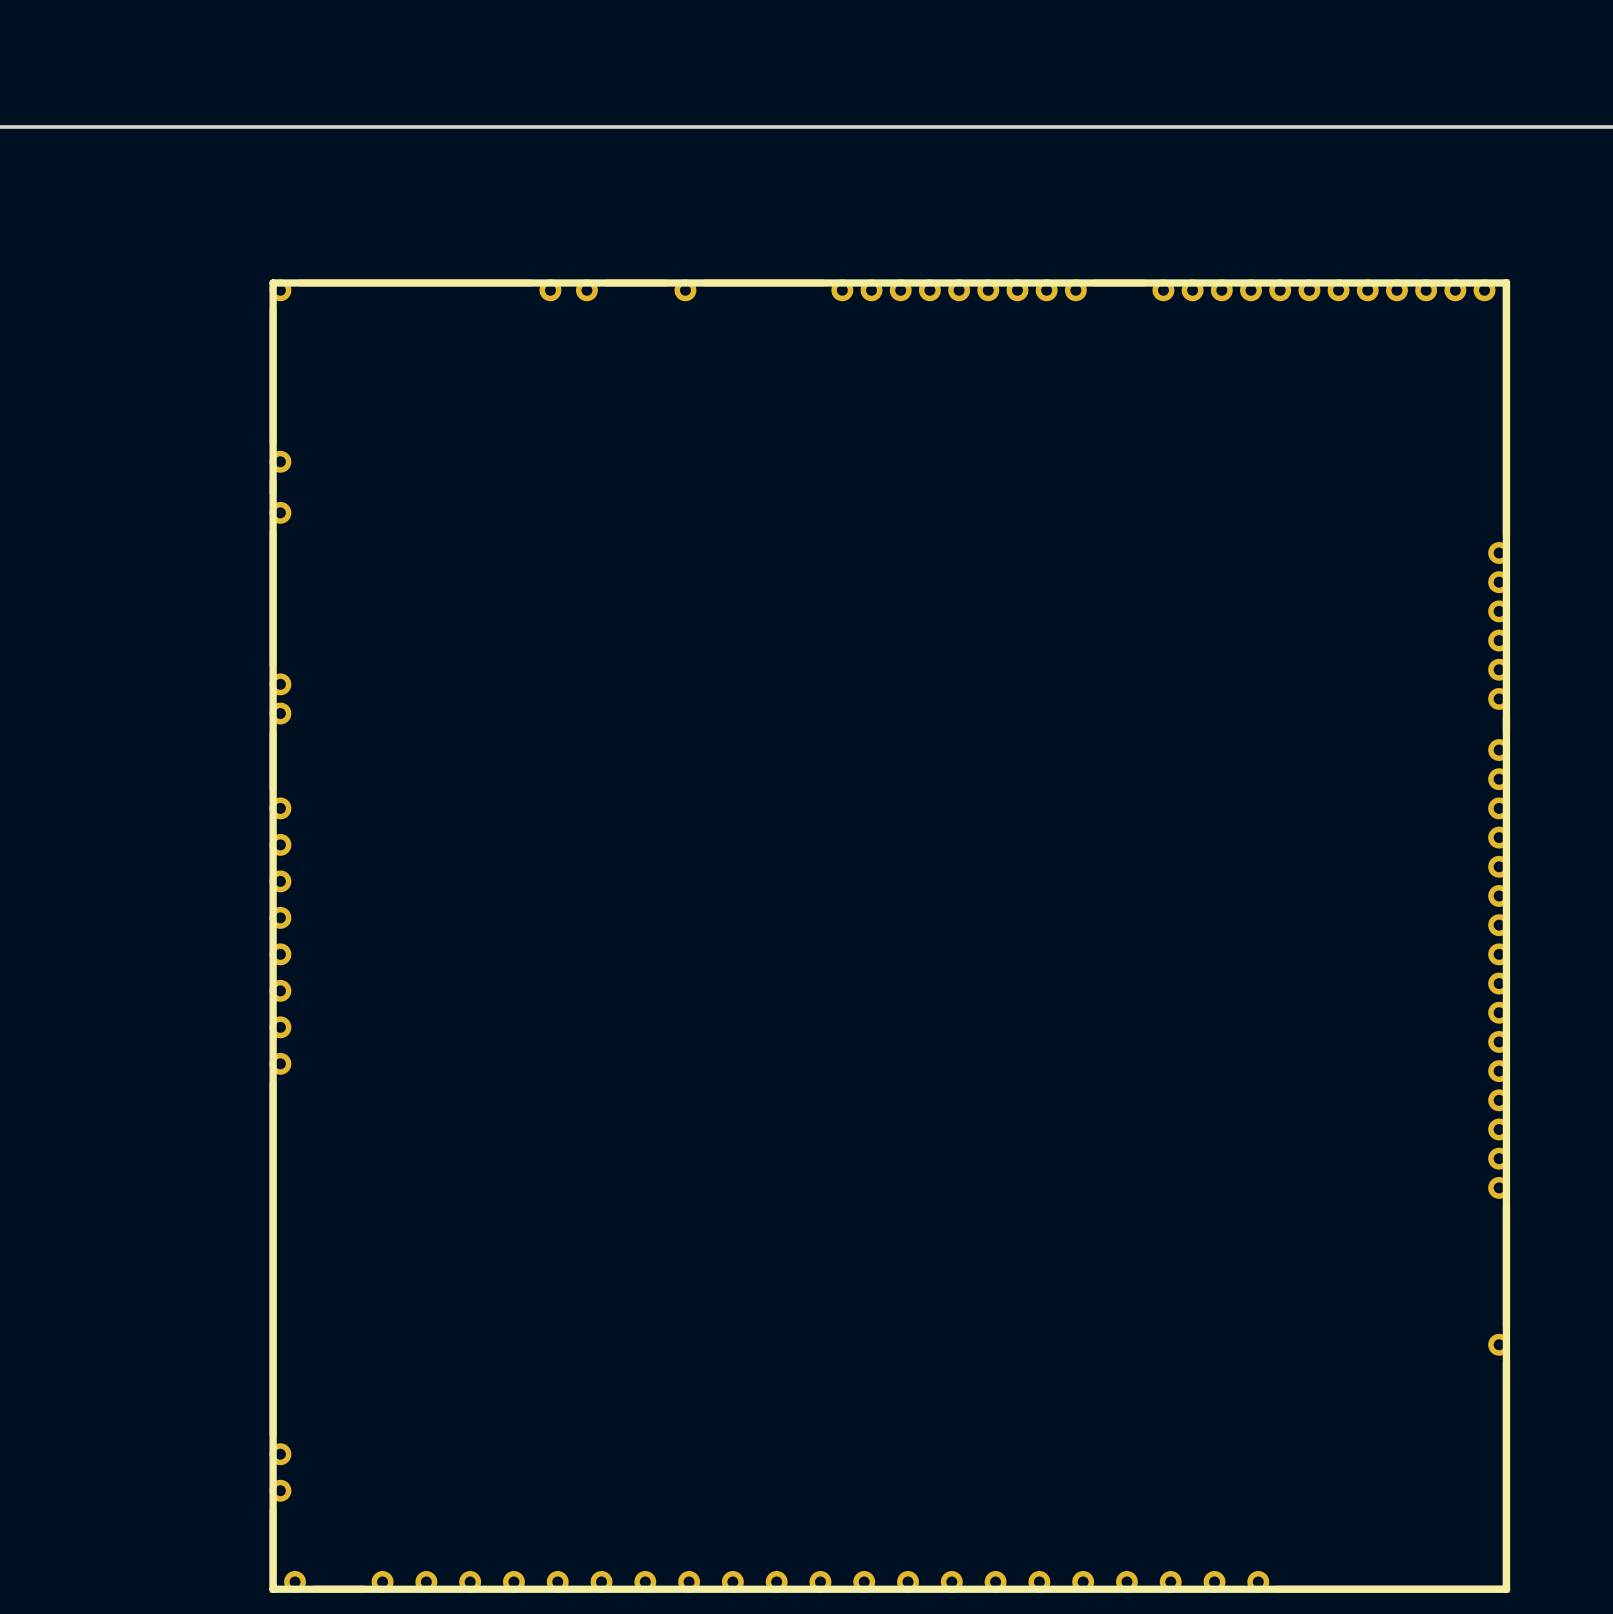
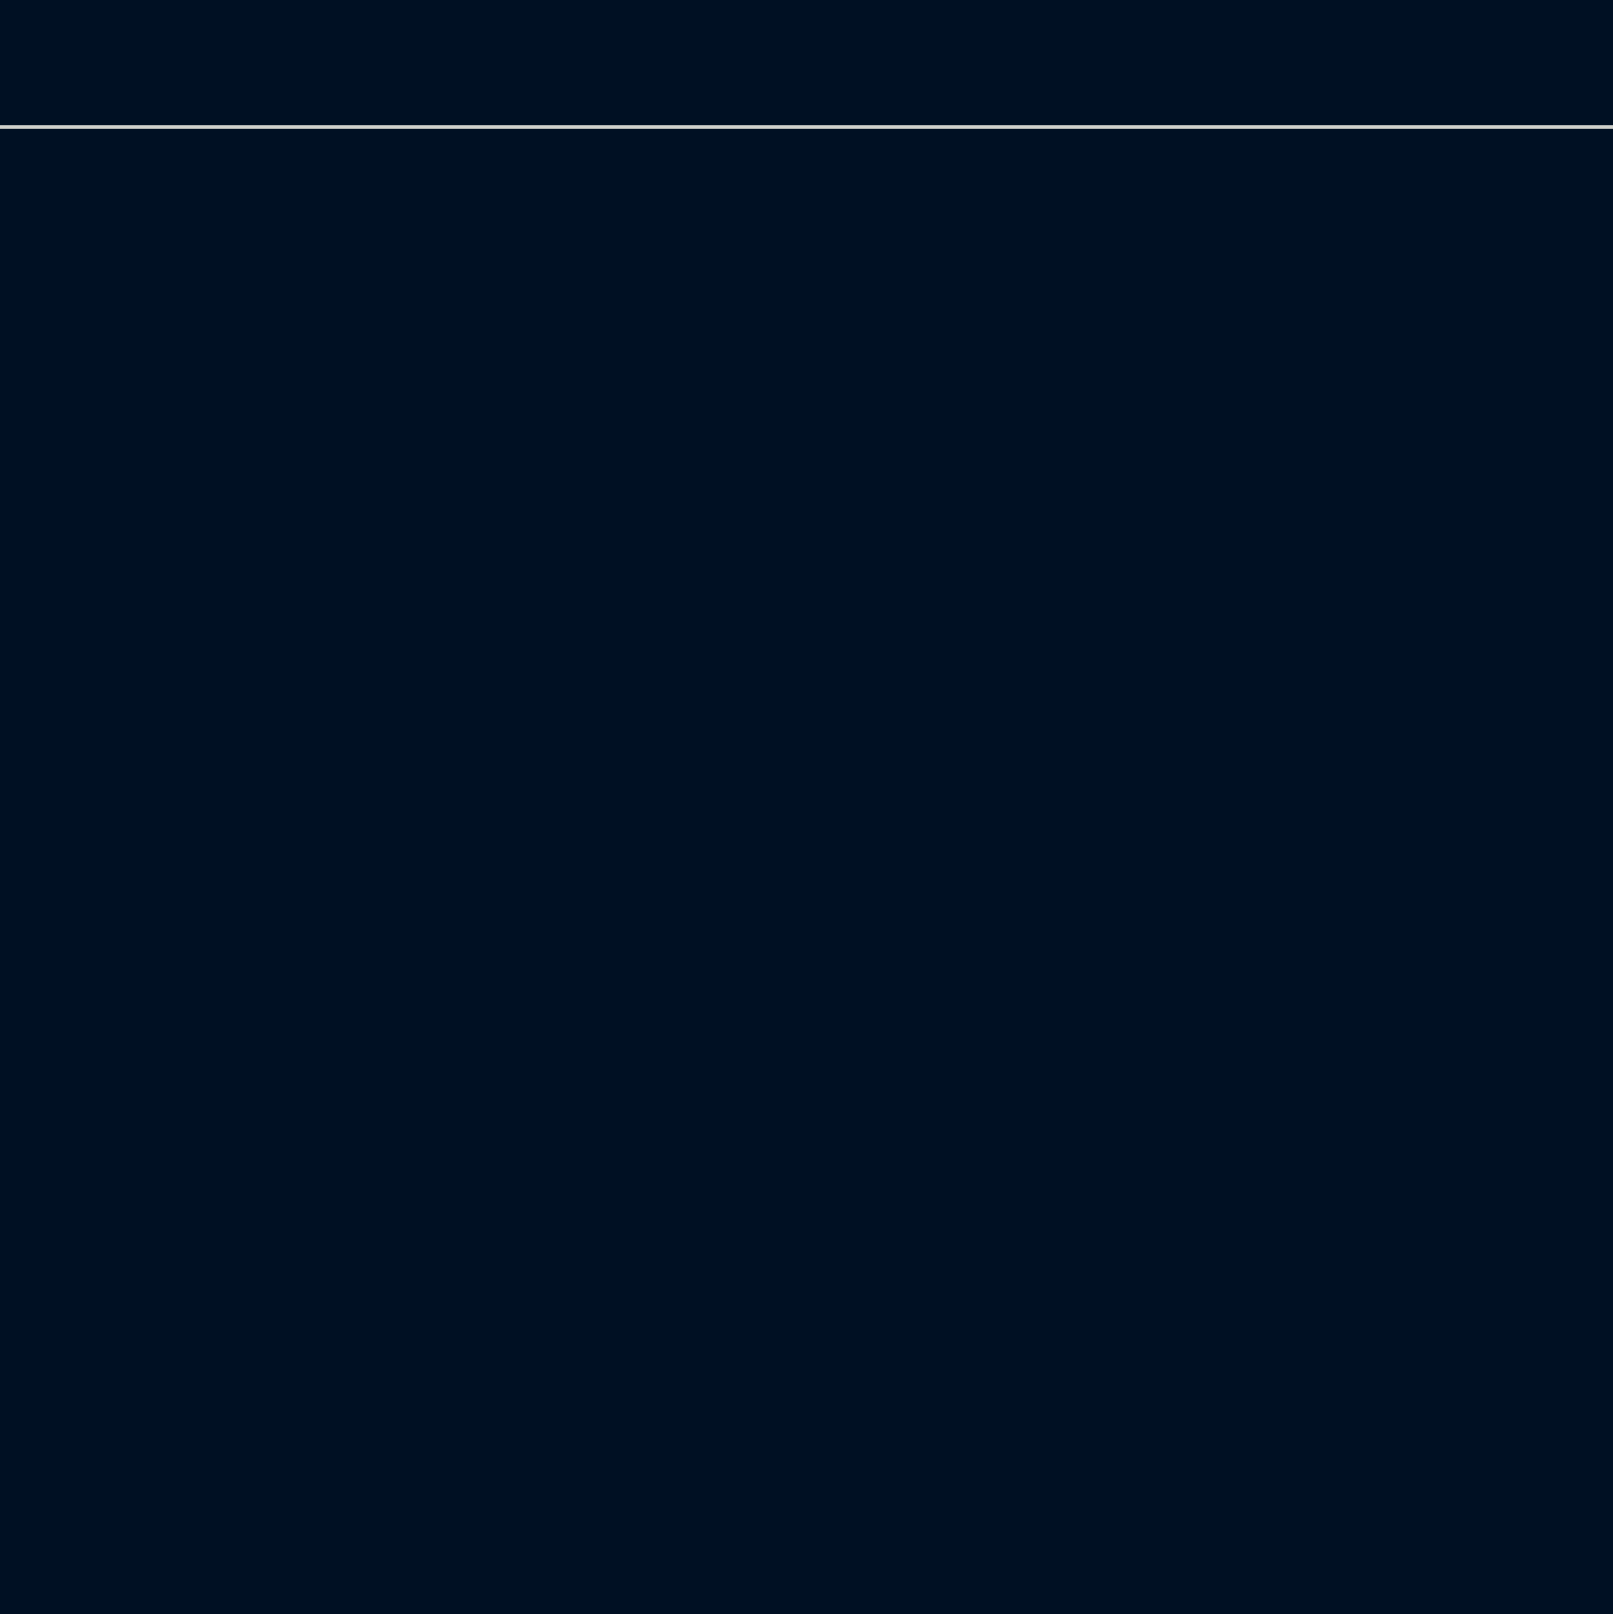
part: (889, 936) -> none

